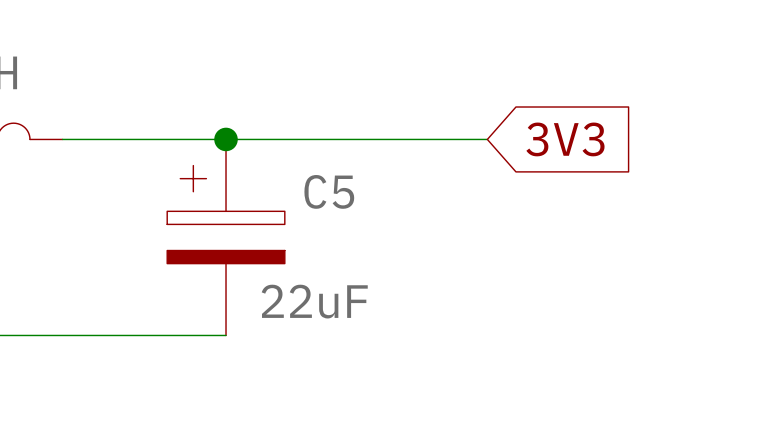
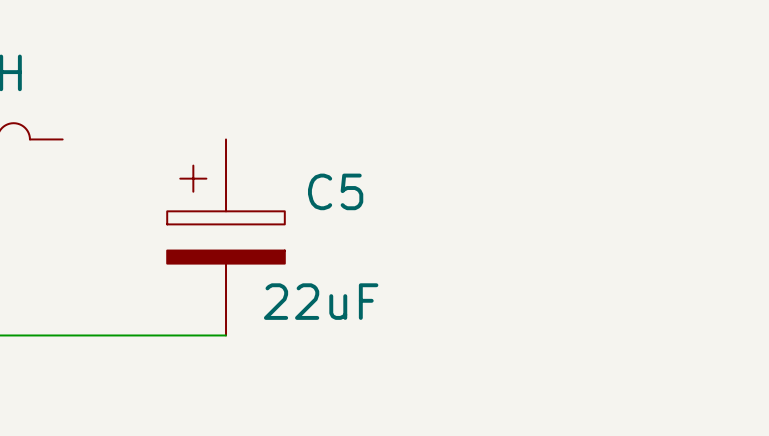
wire: (62, 139) (487, 139) -> none
junction: (226, 139) -> none
global label: 3V3 (565, 139) -> none

